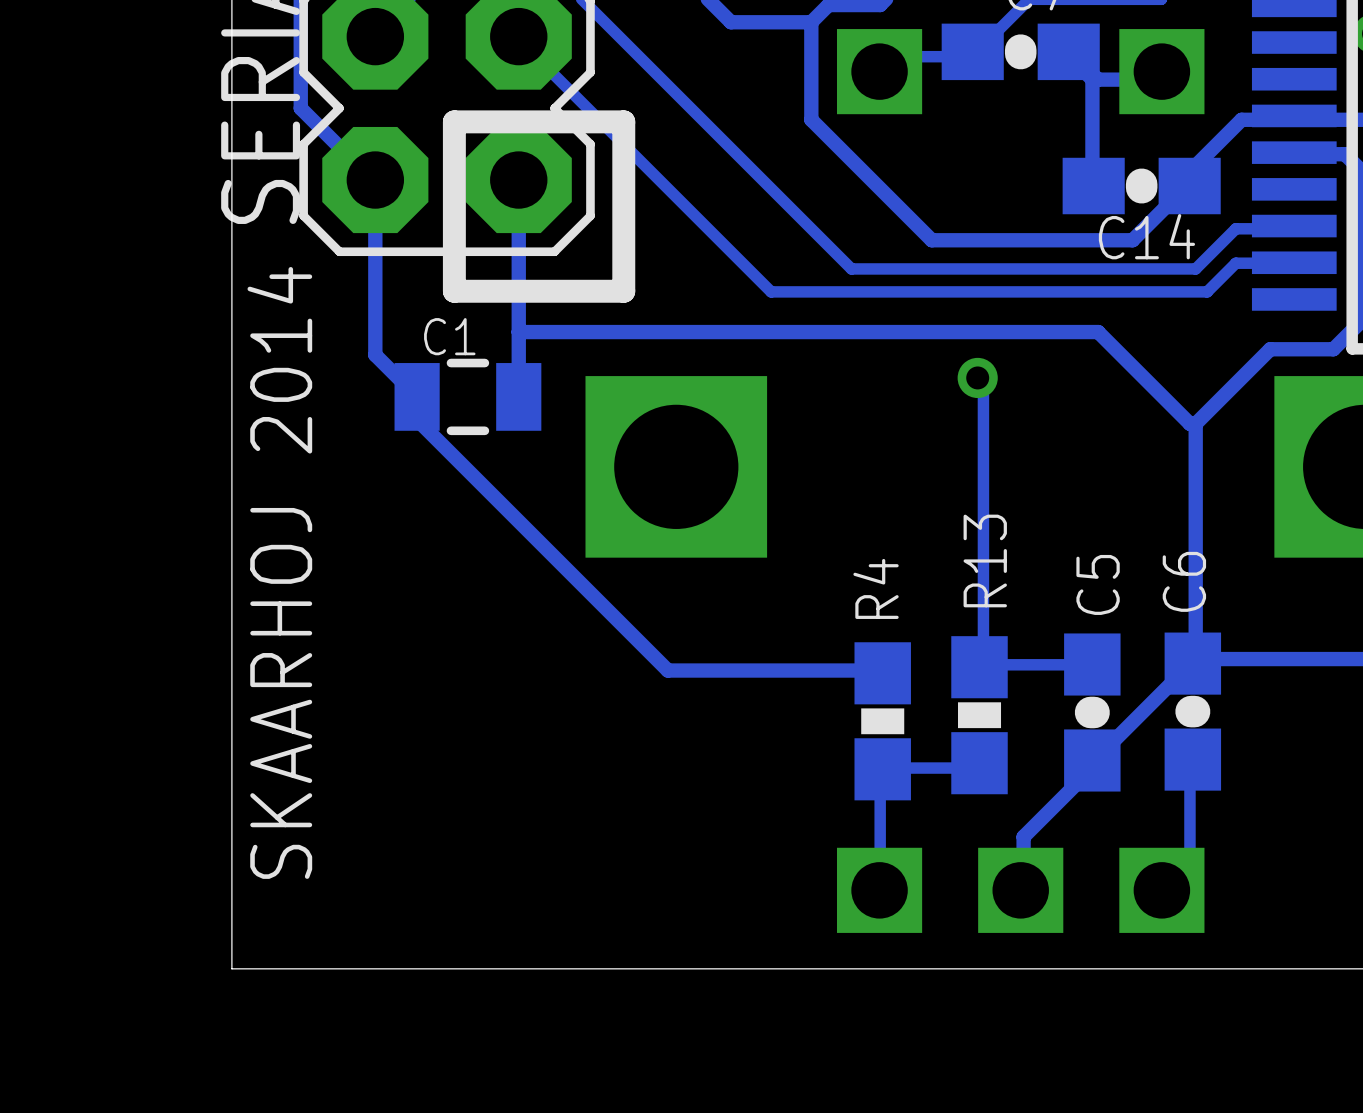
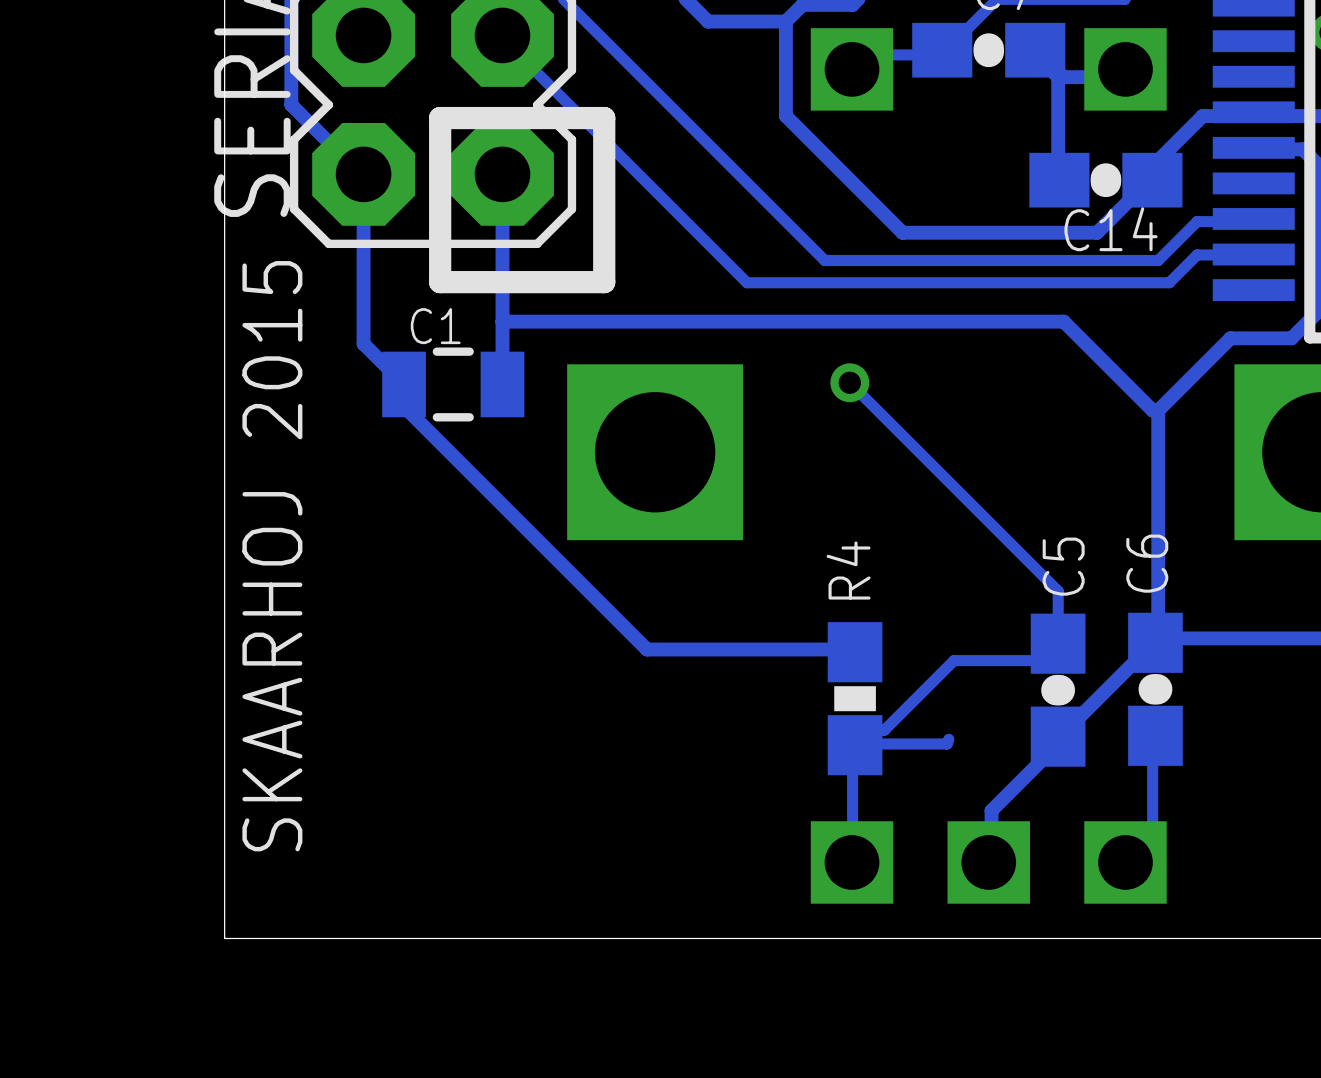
track: (977, 377) (983, 383) (983, 659) (979, 667) (983, 664) (1092, 664) -> none
via position: (977, 377) -> (849, 382)
track: none -> (849, 382) (1058, 591) (1058, 660) (954, 660) (884, 730) (849, 730) (855, 745)
text: SKAARHOJ 2014 (279, 572) -> SKAARHOJ 2015 (272, 556)
R13: (979, 715) -> none

